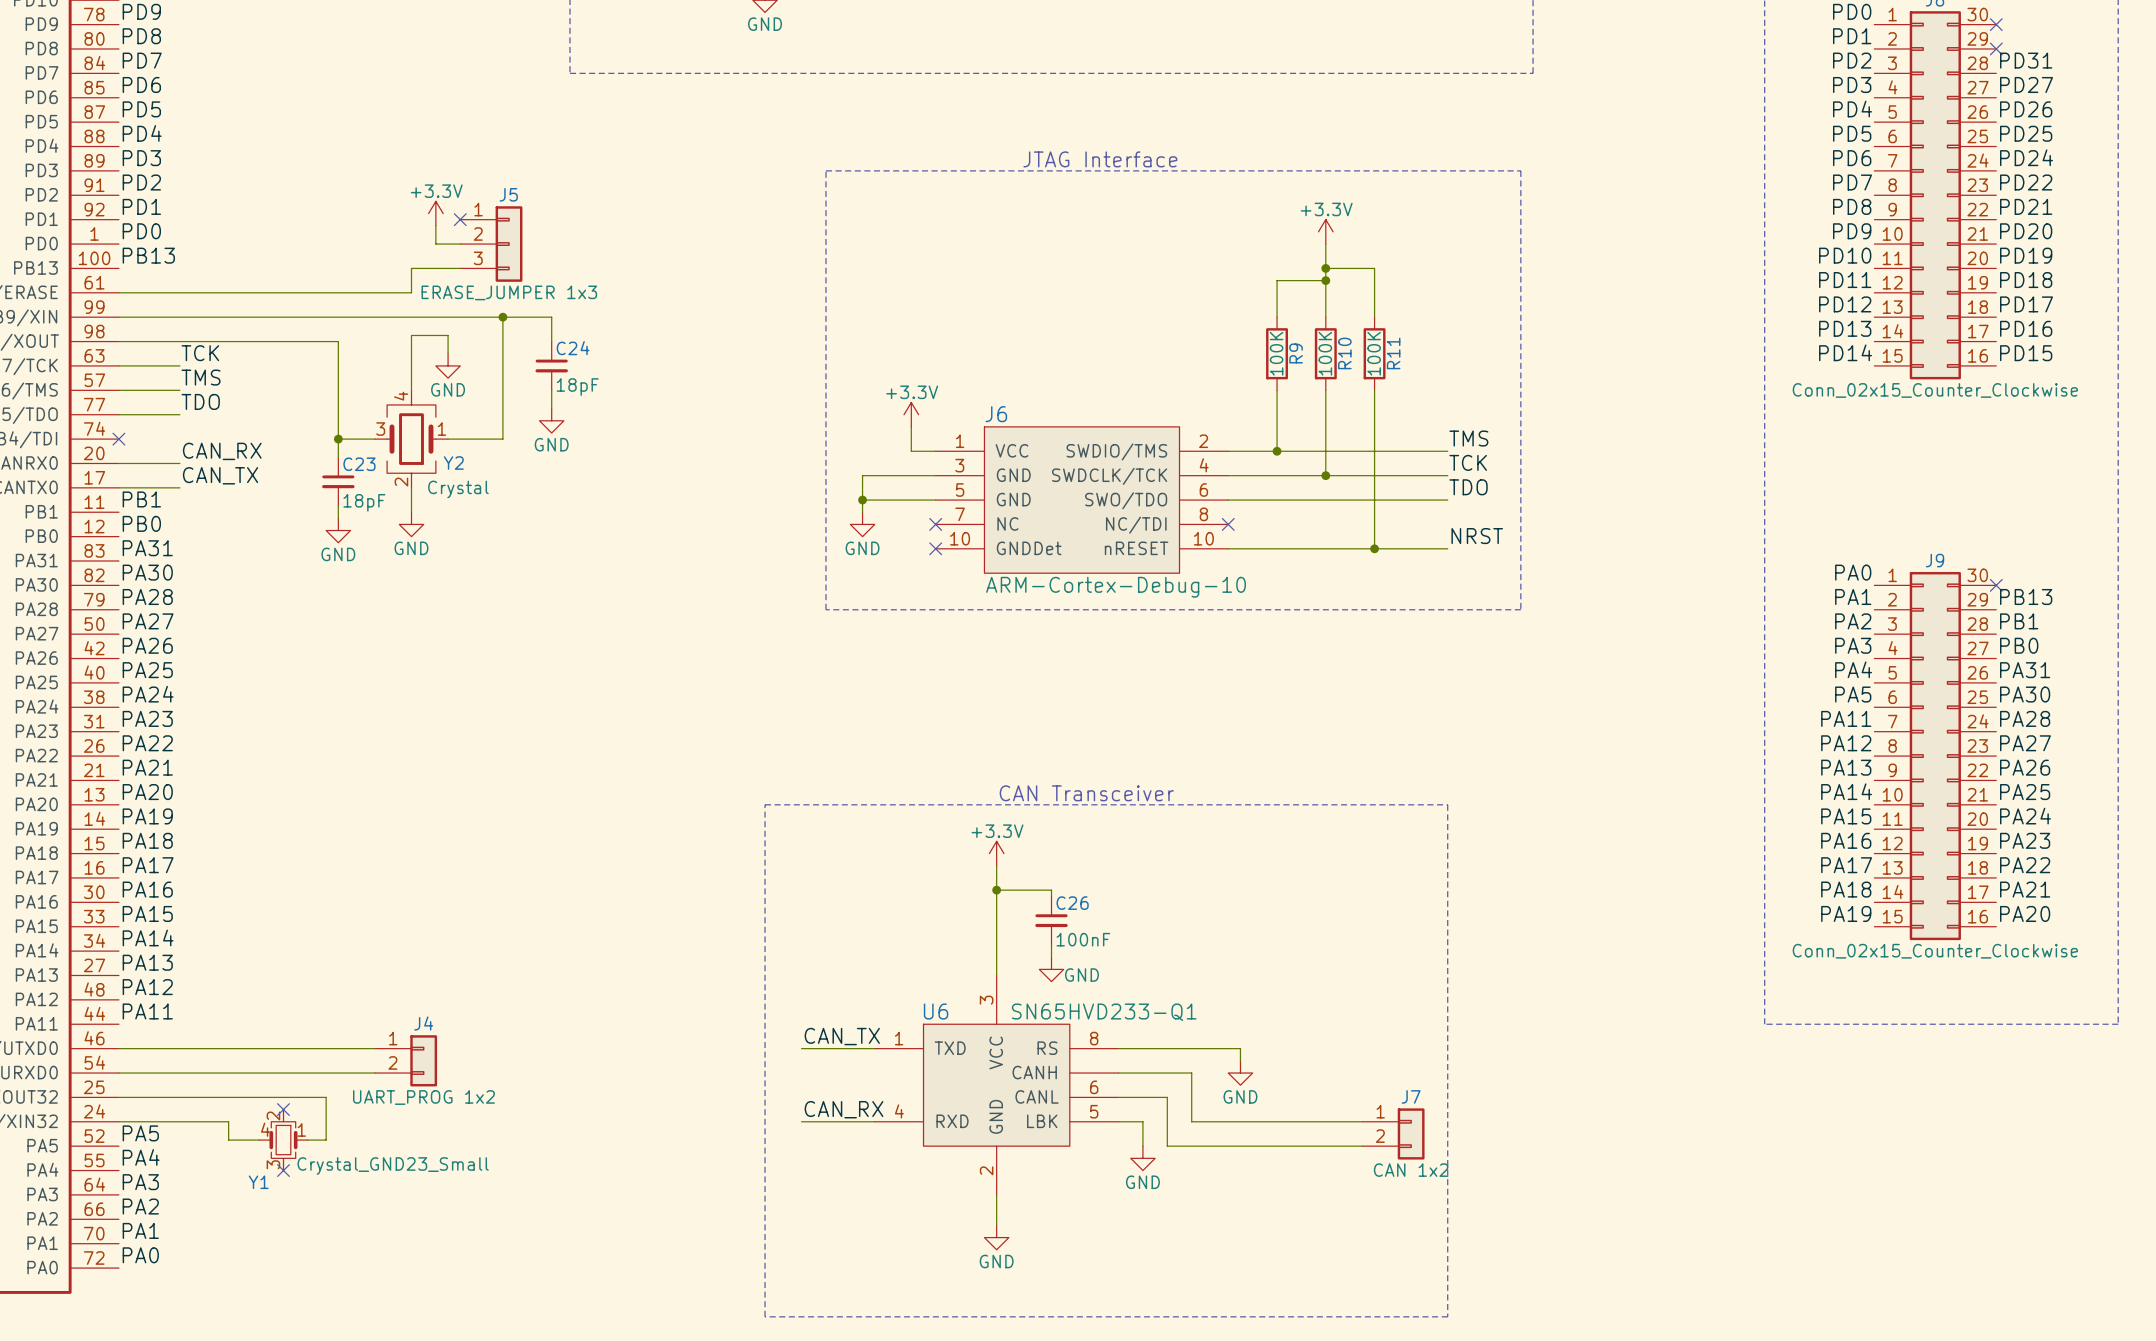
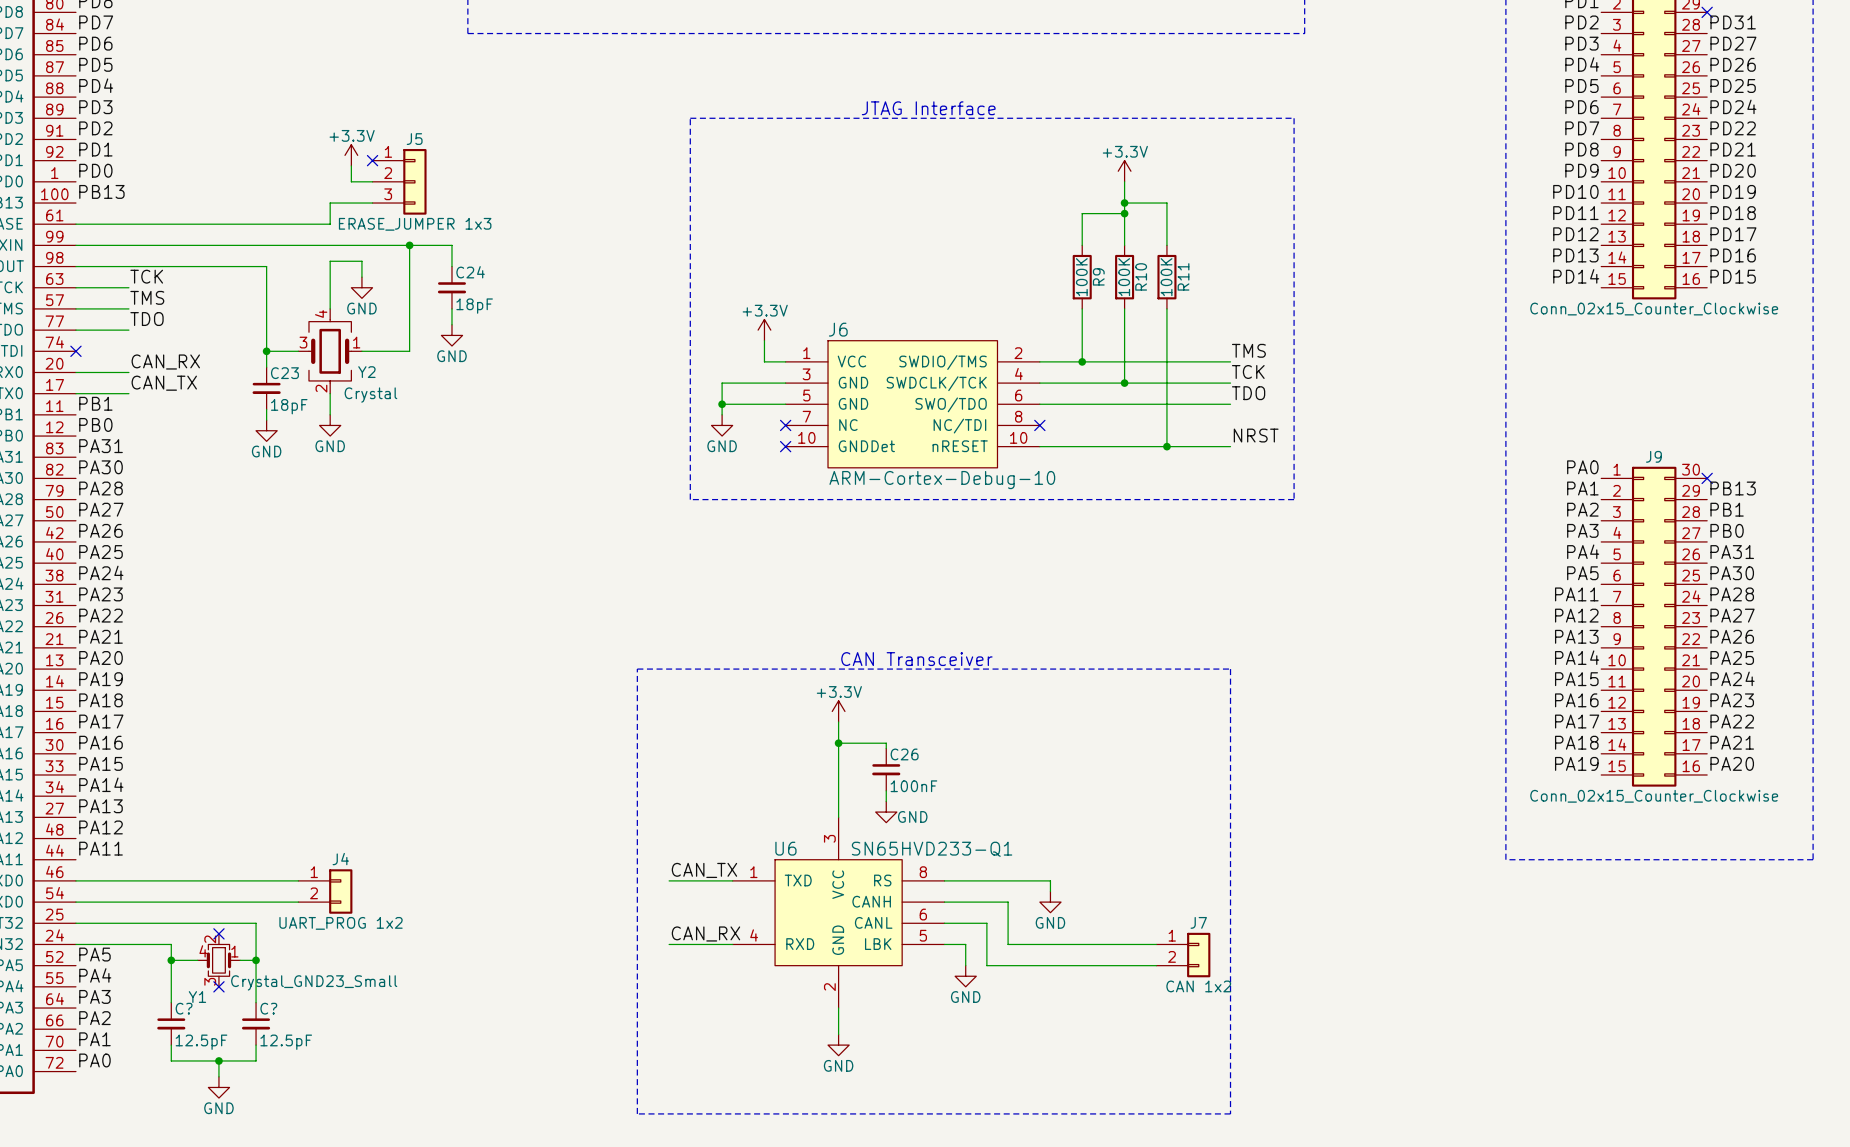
wire: none -> (171, 960) (171, 1002)
junction: none -> (171, 960)
wire: none -> (256, 960) (256, 1002)
junction: none -> (256, 960)
C?: none -> 12.5pF (171, 1023)
C?: none -> 12.5pF (256, 1023)
wire: none -> (171, 1045) (171, 1060) (256, 1060) (256, 1045)
wire: none -> (218, 1060) (218, 1076)
junction: none -> (218, 1060)
power symbol: none -> GND (218, 1087)

